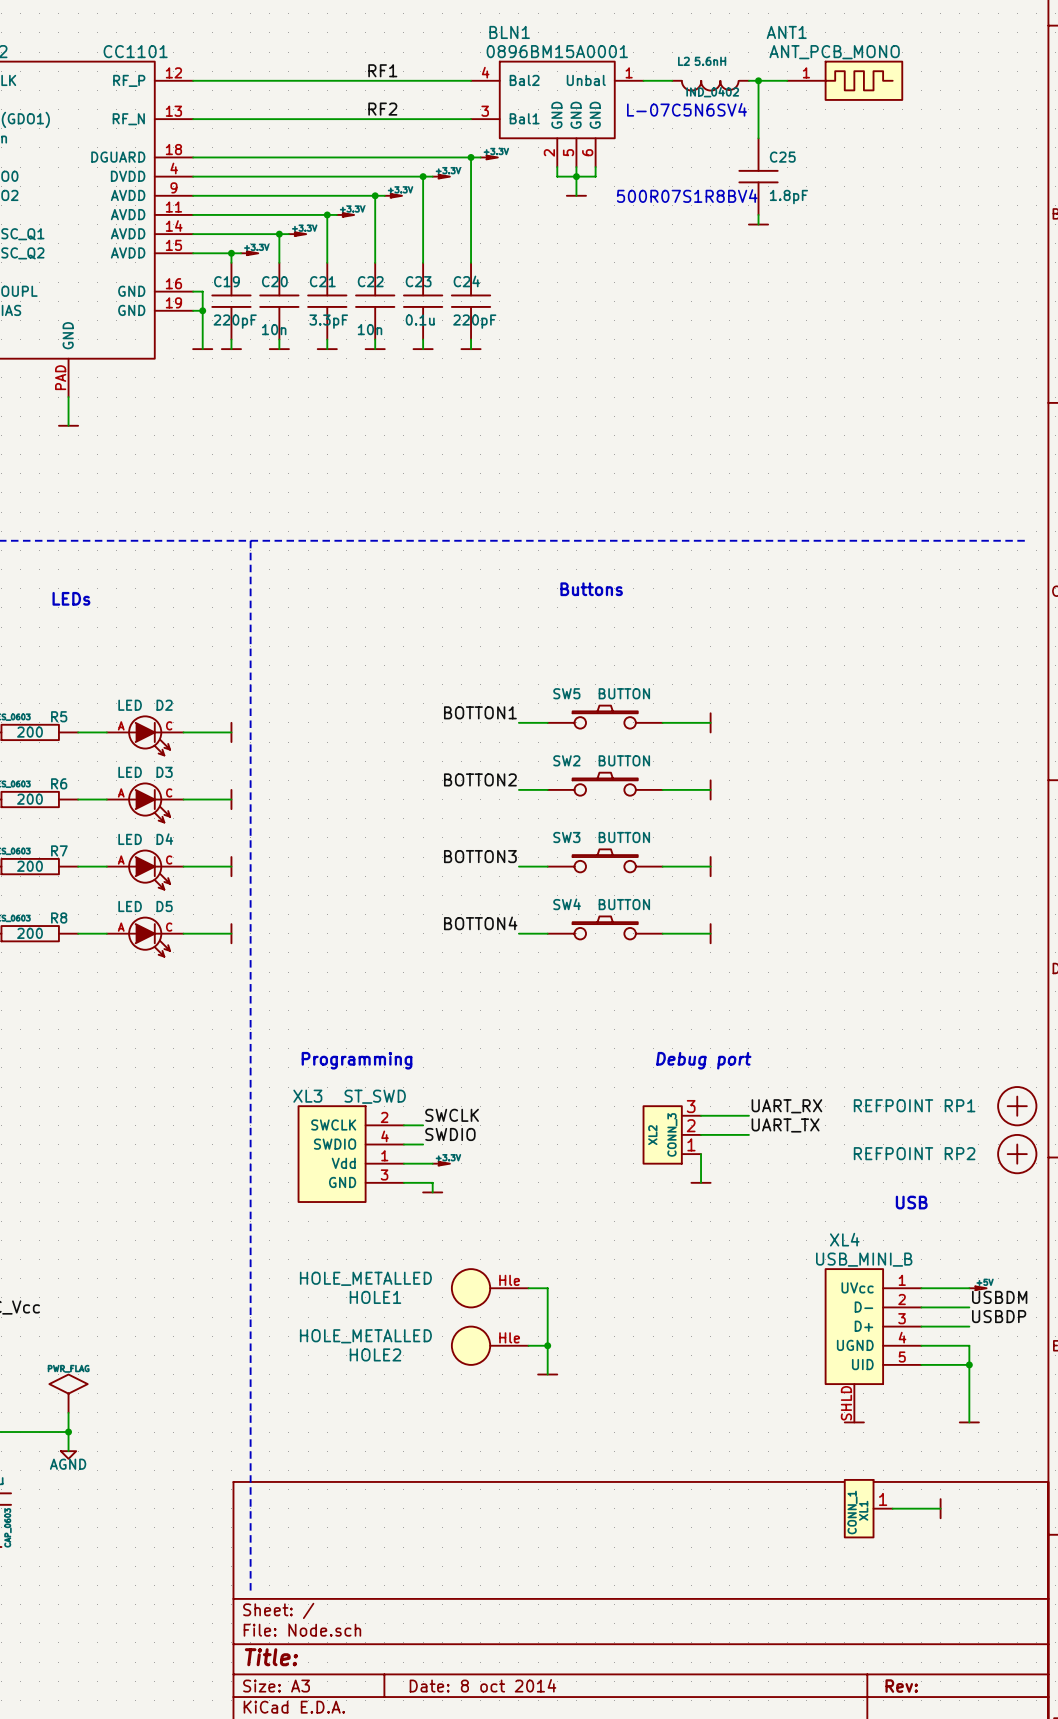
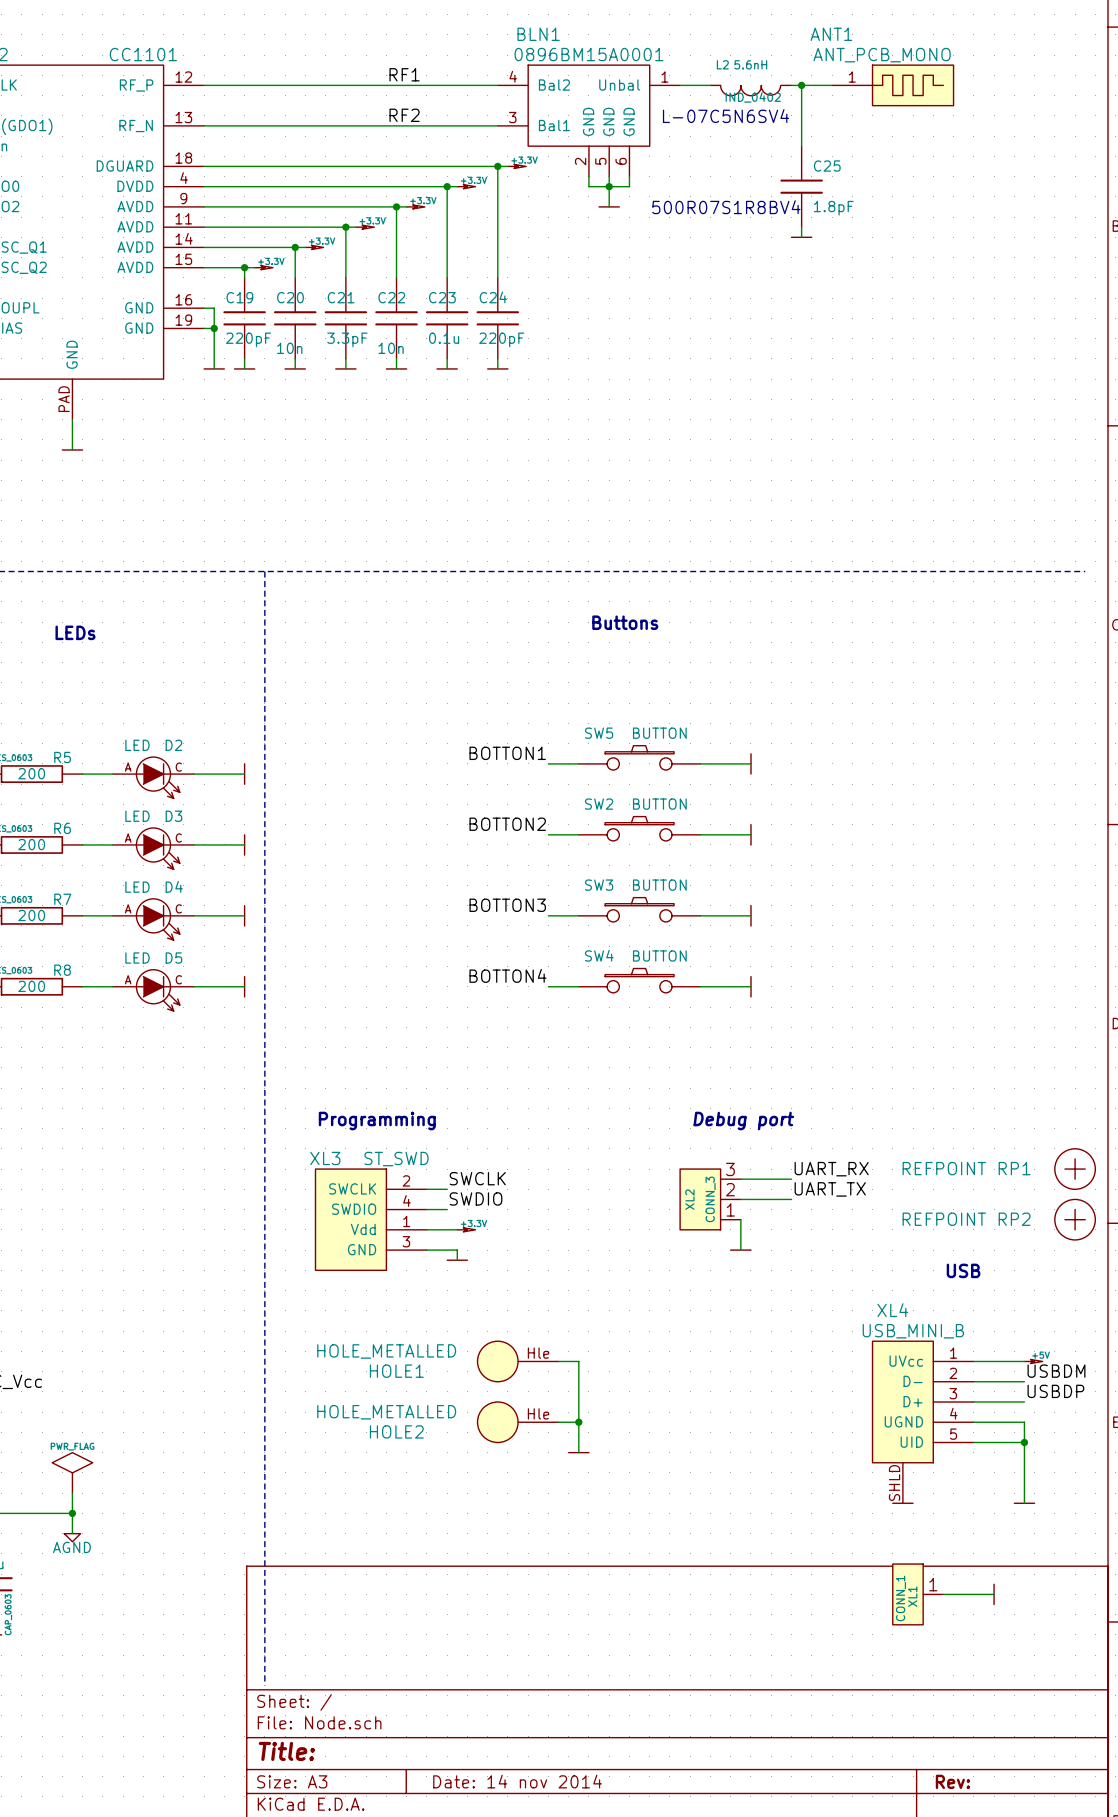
title block: Date: 8 oct 2014 (482, 1685) -> Date: 14 nov 2014 (517, 1781)

